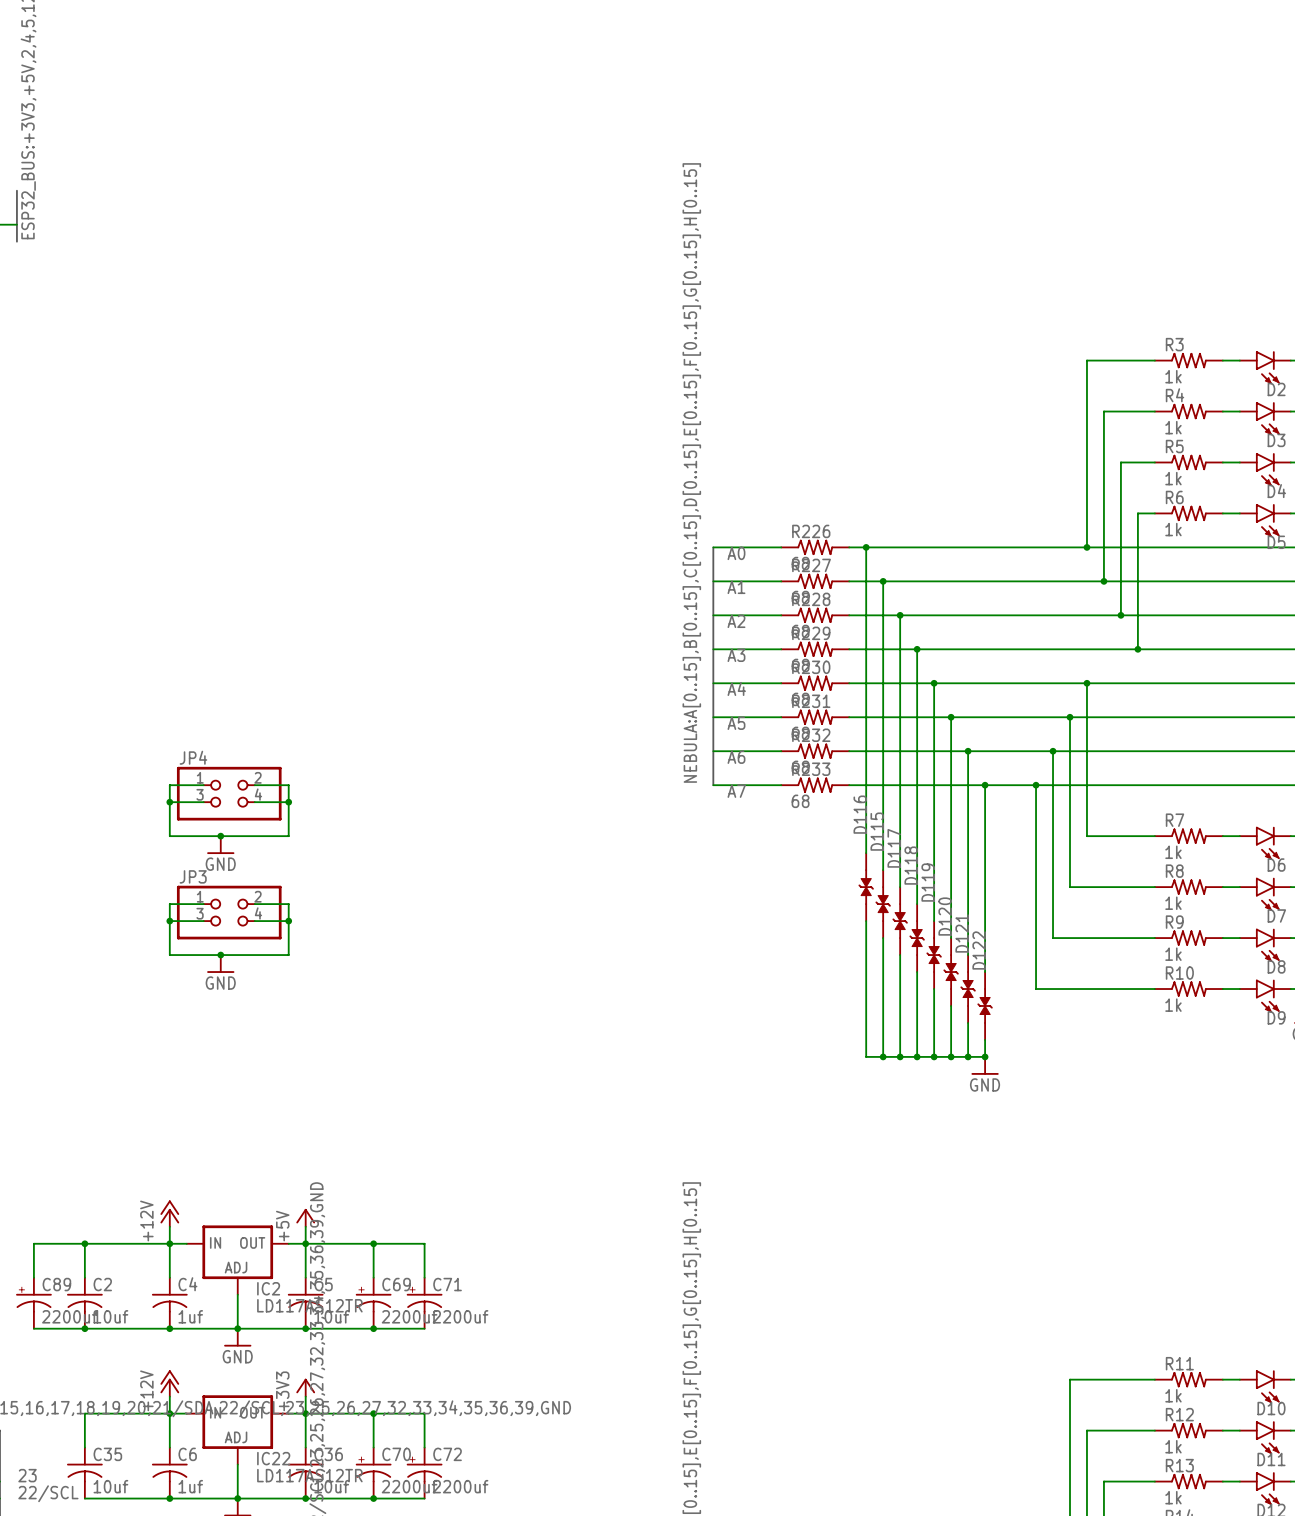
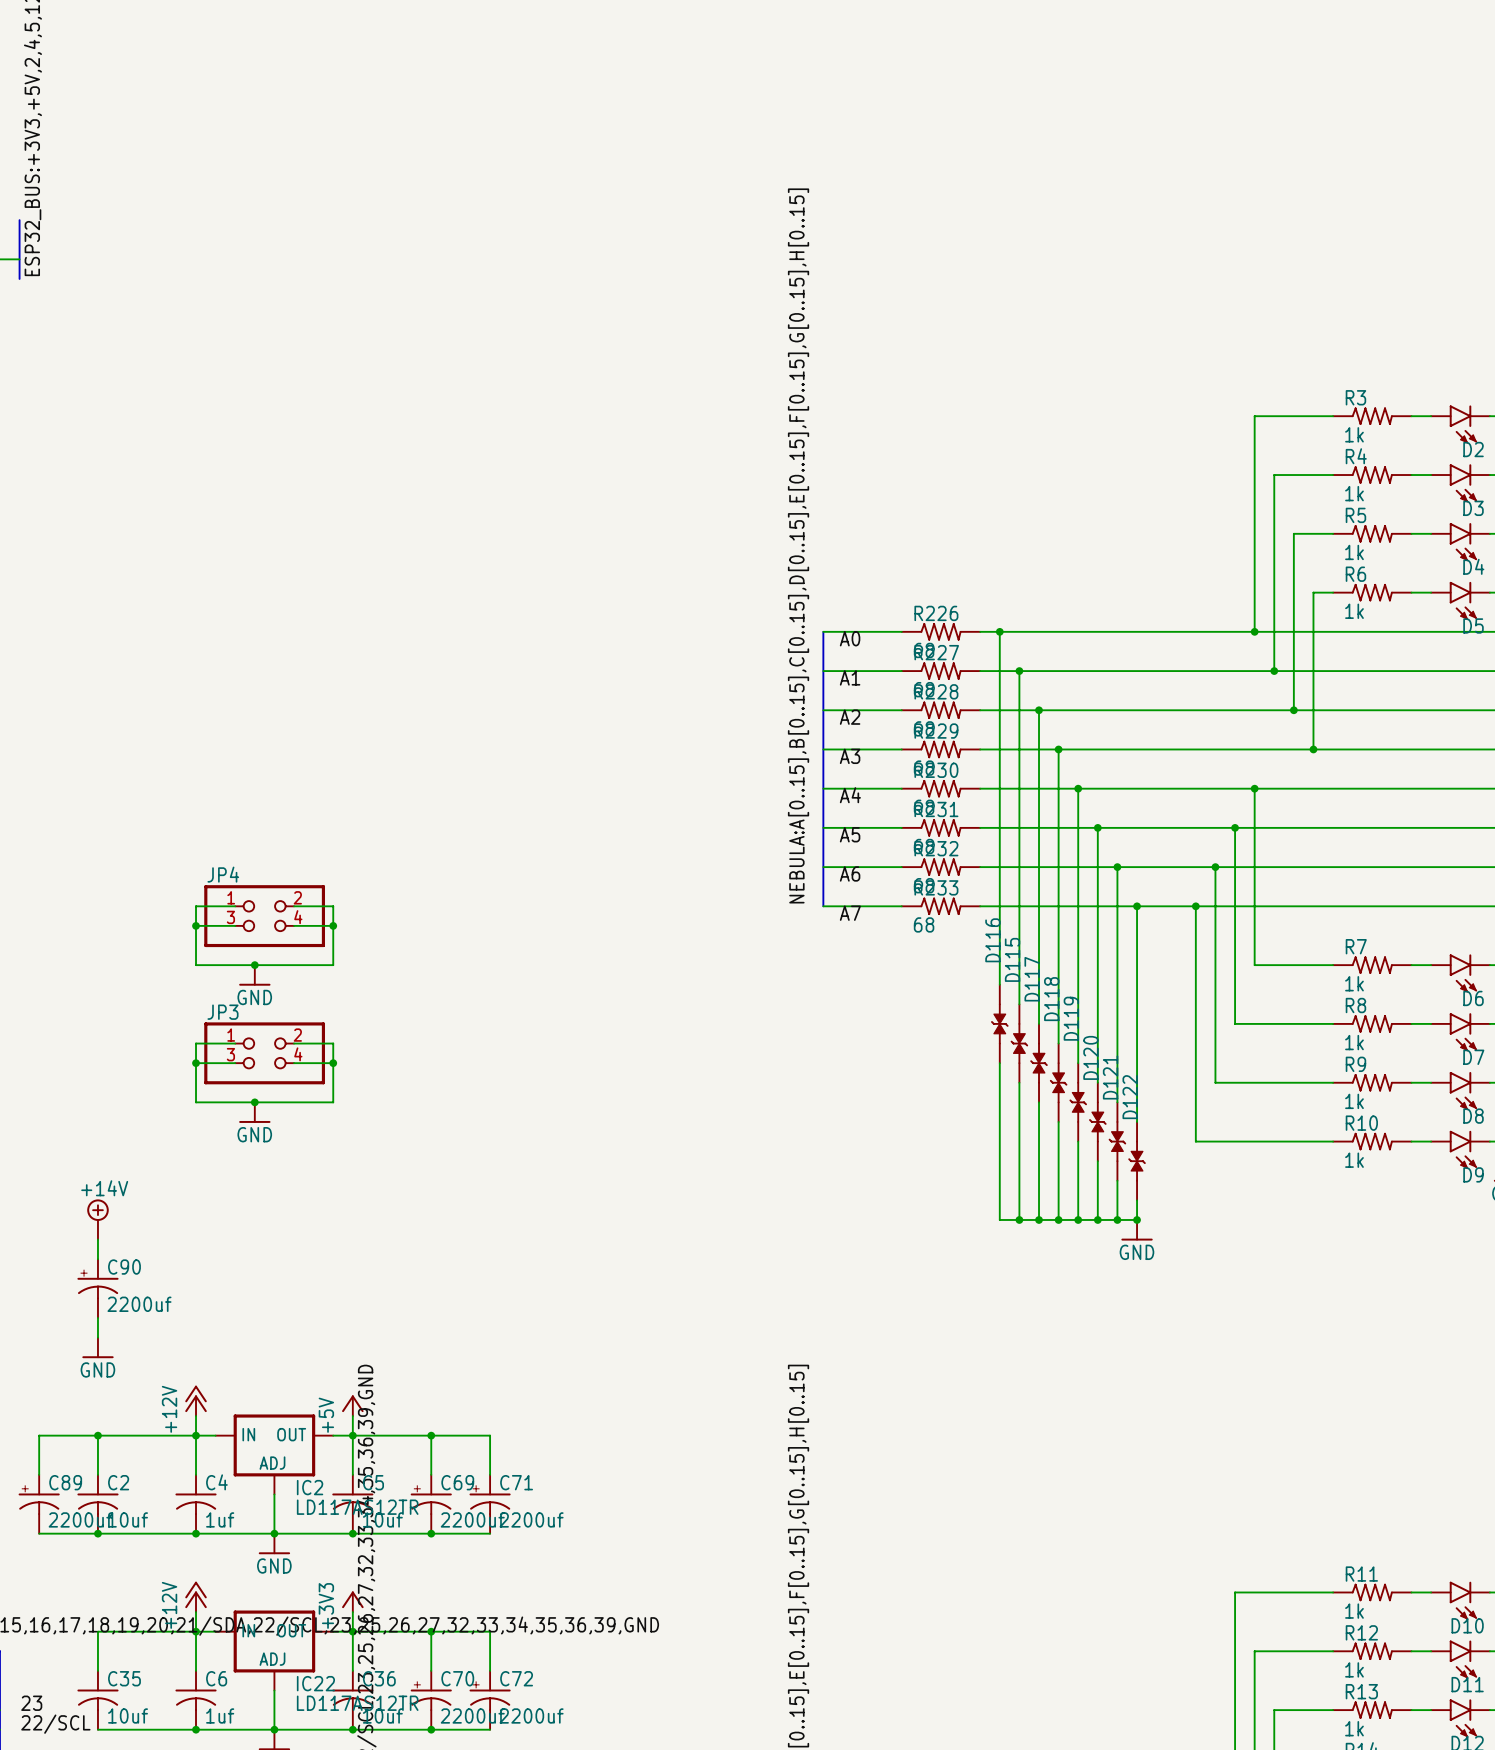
power symbol: none -> +14V (97, 1219)
wire: none -> (97, 1239) (97, 1259)
C90: none -> 2200uf (97, 1288)
wire: none -> (97, 1318) (97, 1337)
power symbol: none -> GND (97, 1347)

